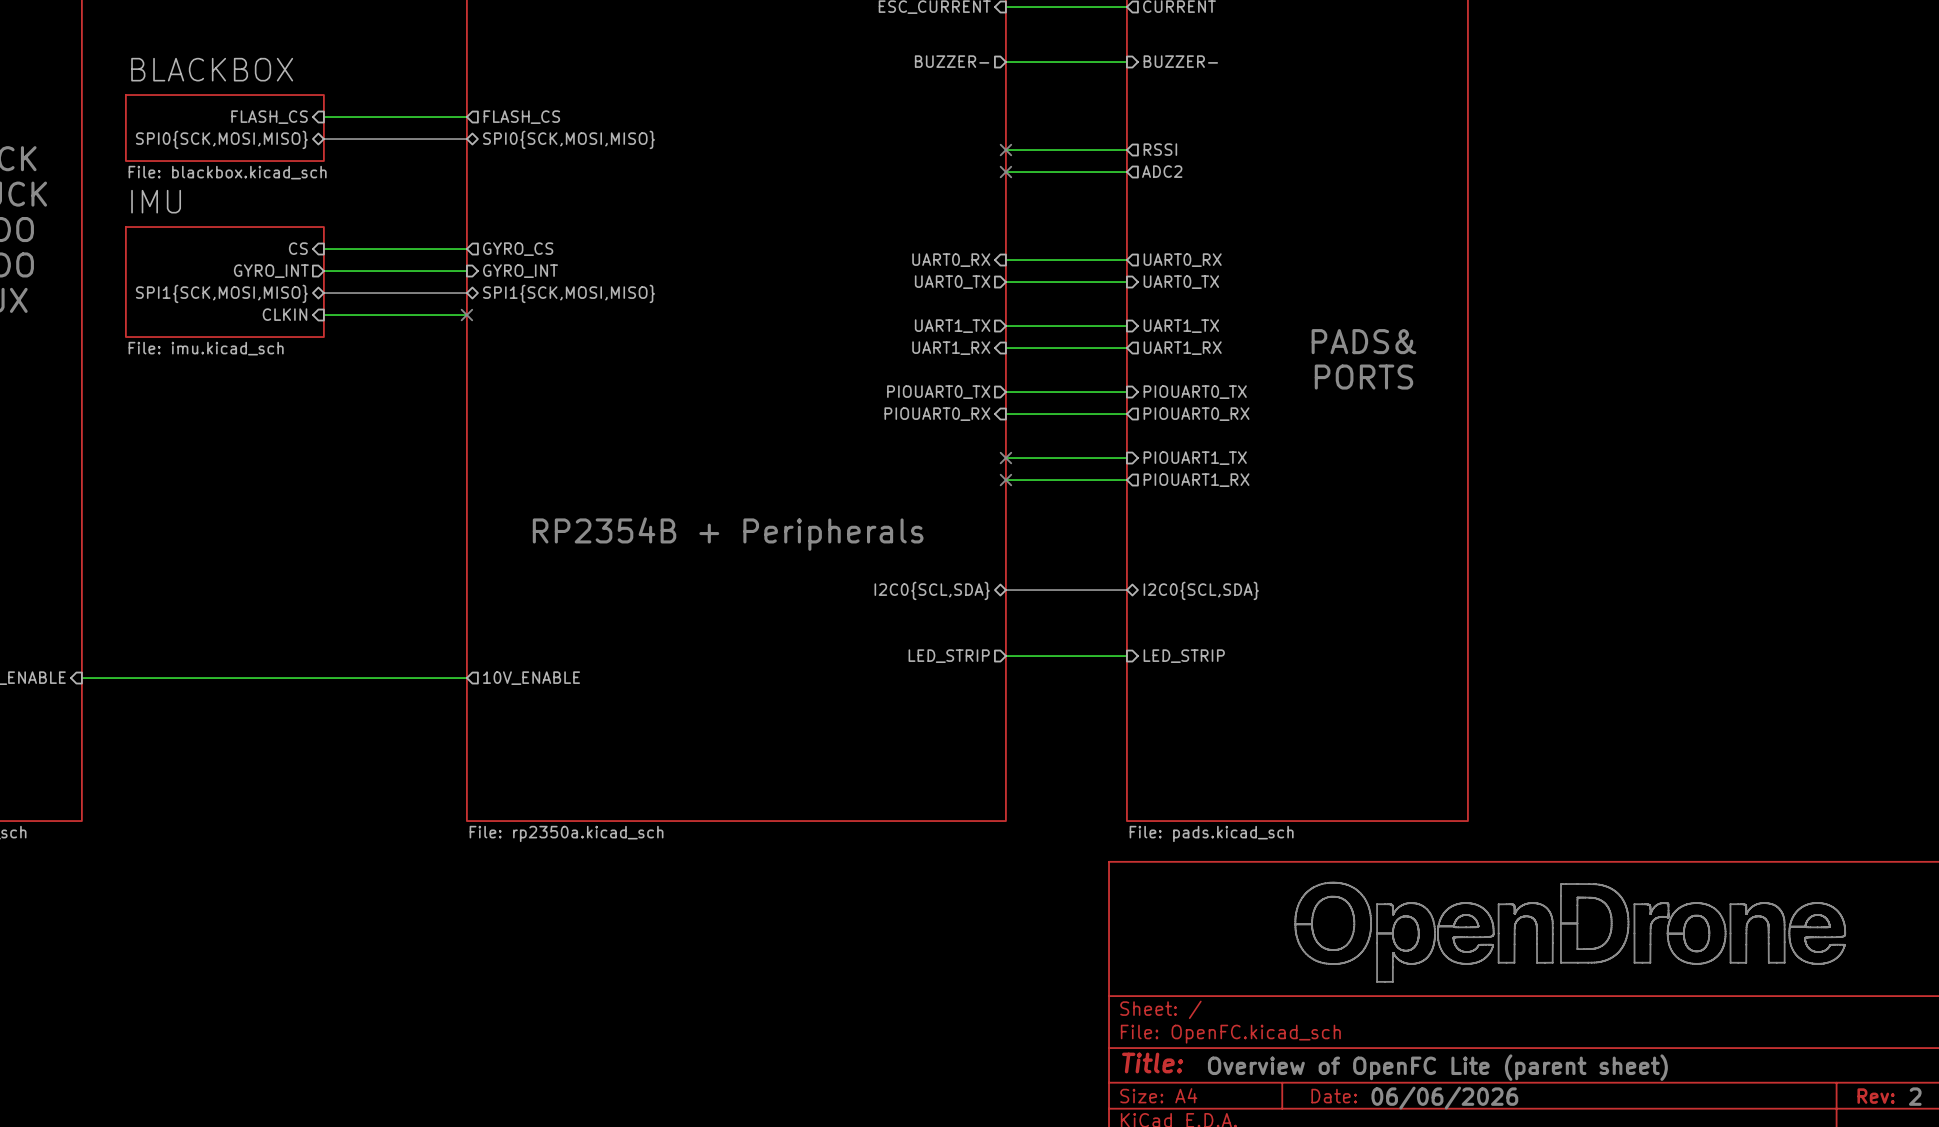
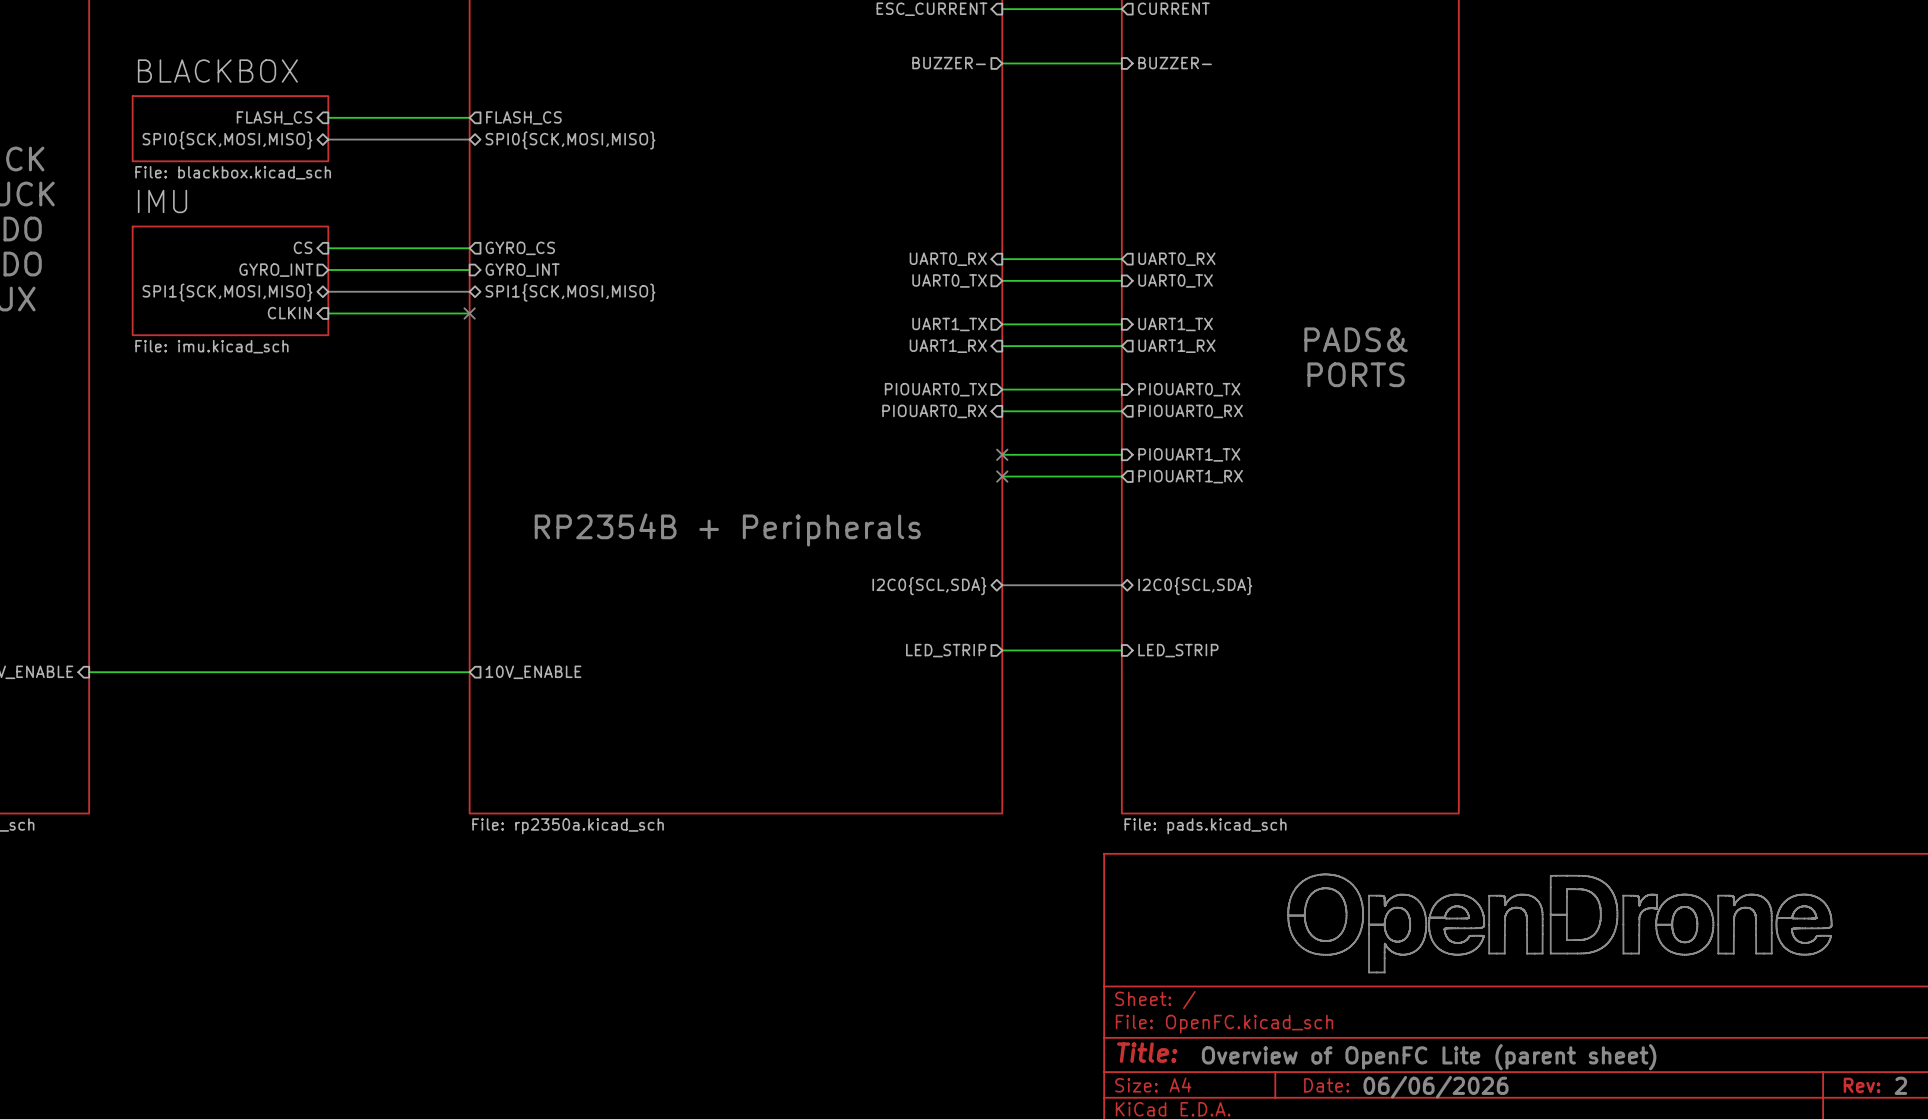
sheet pin: RSSI (1160, 149) -> none
wire: (1005, 150) (1126, 150) -> none
no-connect mark: (1005, 150) -> none
sheet pin: ADC2 (1162, 171) -> none
wire: (1005, 172) (1126, 172) -> none
no-connect mark: (1005, 172) -> none

